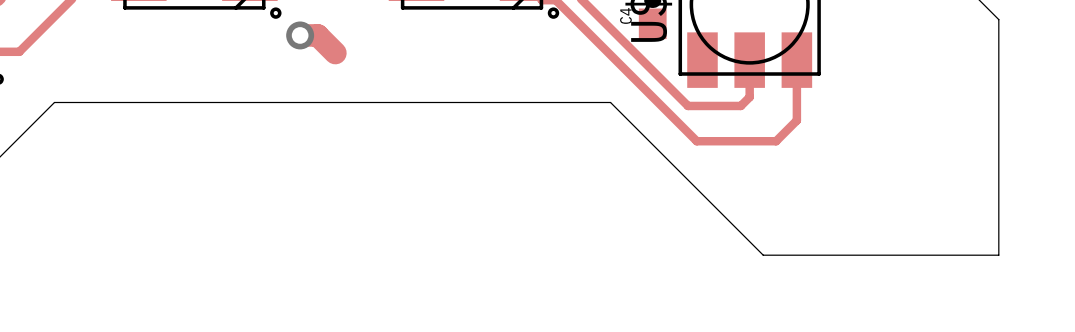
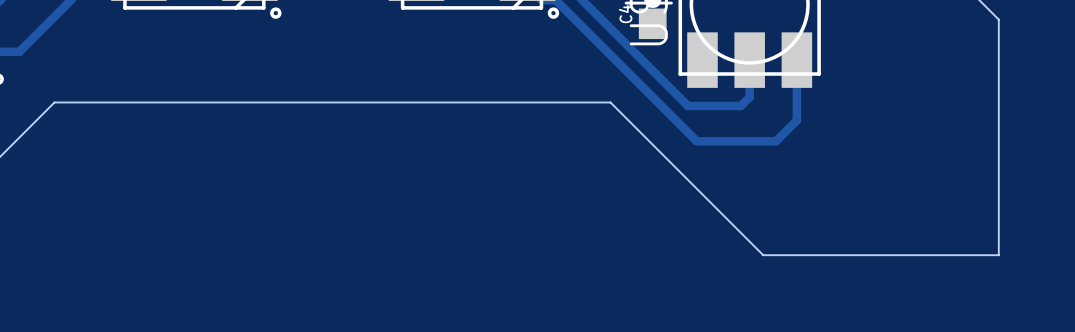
track: (300, 35) (317, 35) (335, 53) -> none
via: (300, 35) -> none

